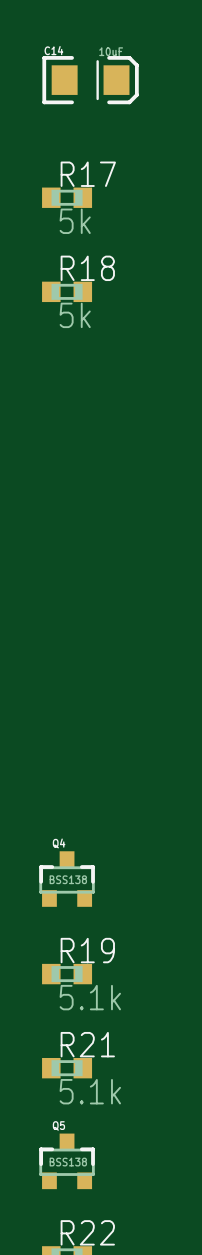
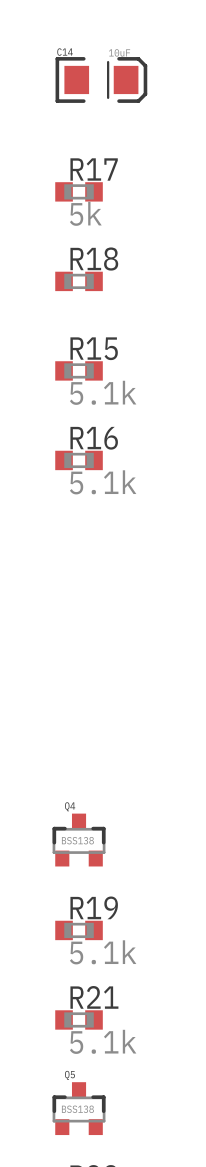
R18 value: 5k (75, 315) -> none
R15: none -> 5.1k (79, 370)
R16: none -> 5.1k (79, 460)

